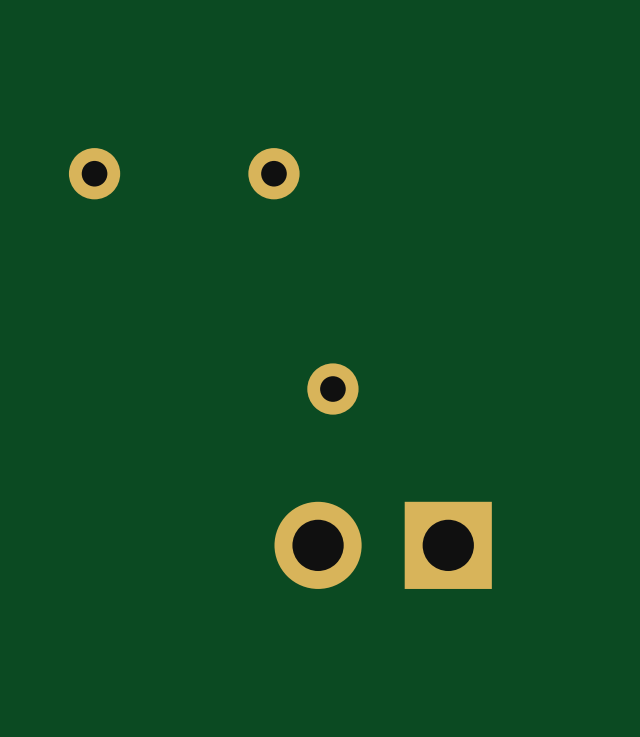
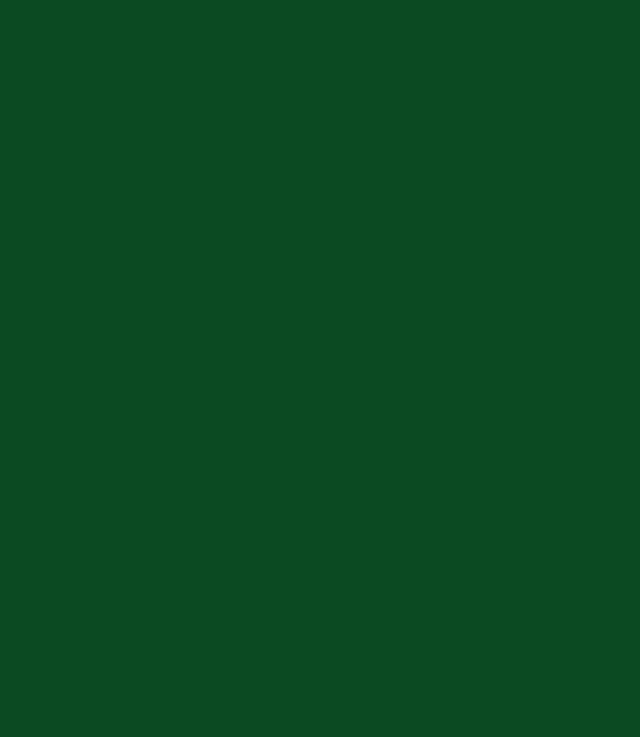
part: (94, 173) -> none
part: (273, 173) -> none
part: (332, 389) -> none
part: (383, 545) -> none

